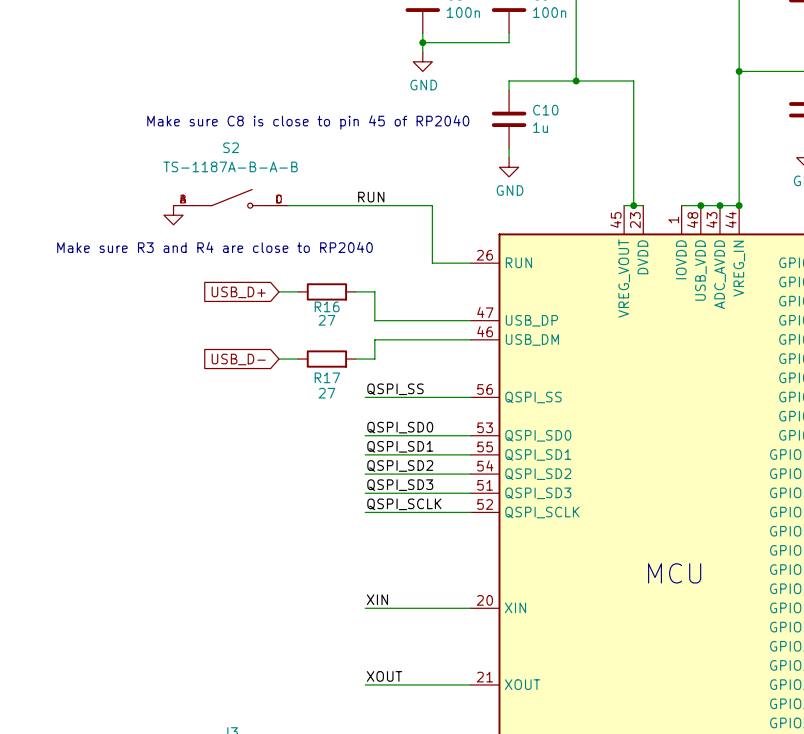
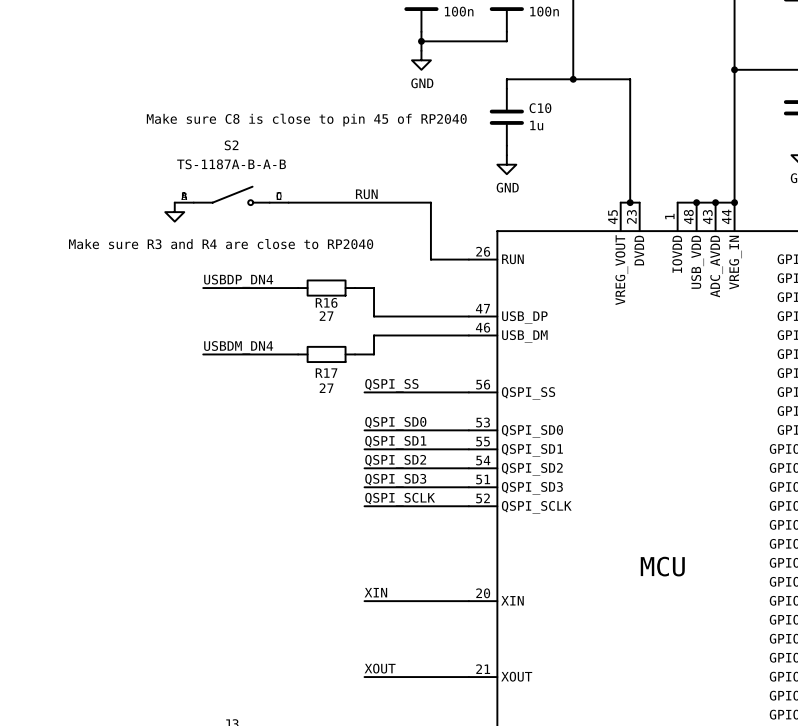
label: none -> USBDP_DN4 (238, 281)
wire: none -> (203, 288) (279, 288)
global label: USB_D+ (238, 292) -> none
label: none -> USBDM_DN4 (238, 347)
wire: none -> (203, 354) (279, 354)
global label: USB_D- (238, 359) -> none

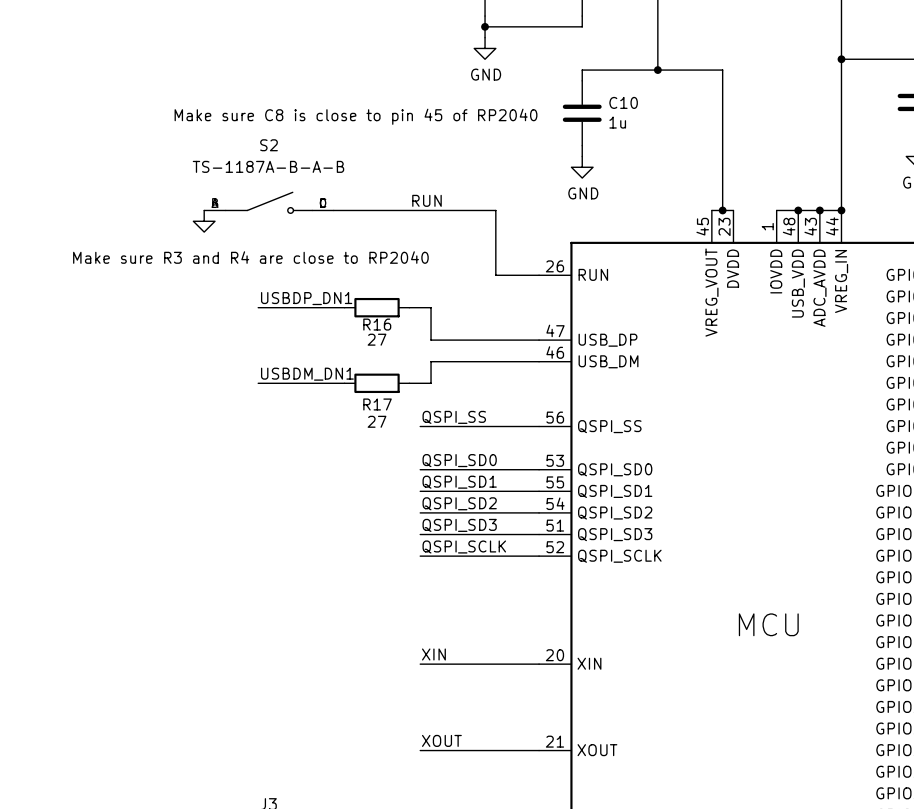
label: USBDP_DN4 (238, 281) -> USBDP_DN1 (306, 298)
wire: (203, 288) (222, 288) -> none
label: USBDM_DN4 (238, 347) -> USBDM_DN1 (307, 374)
wire: (203, 354) (222, 354) -> none

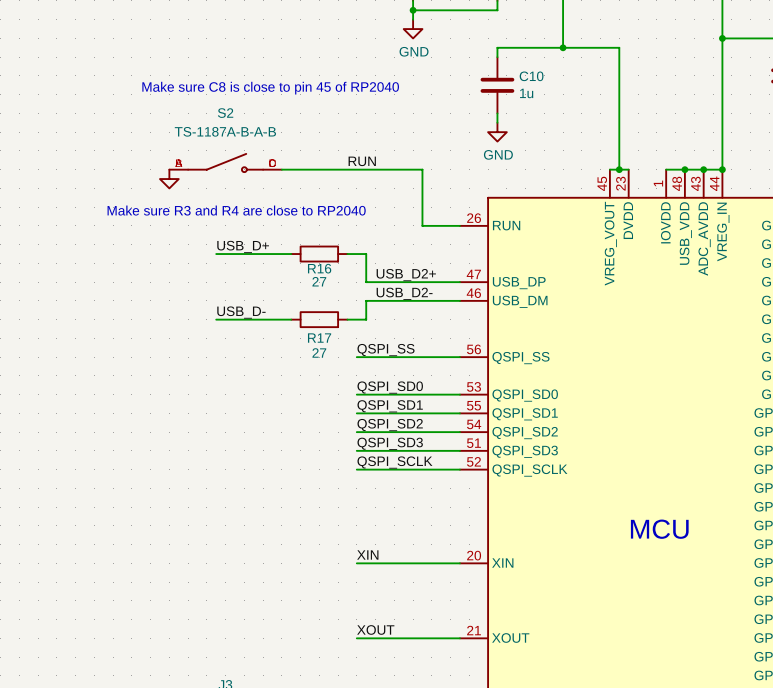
label: USBDP_DN1 (306, 298) -> USB_D+ (243, 246)
label: none -> USB_D2+ (406, 275)
label: none -> USB_D2- (404, 293)
label: USBDM_DN1 (307, 374) -> USB_D- (241, 312)

